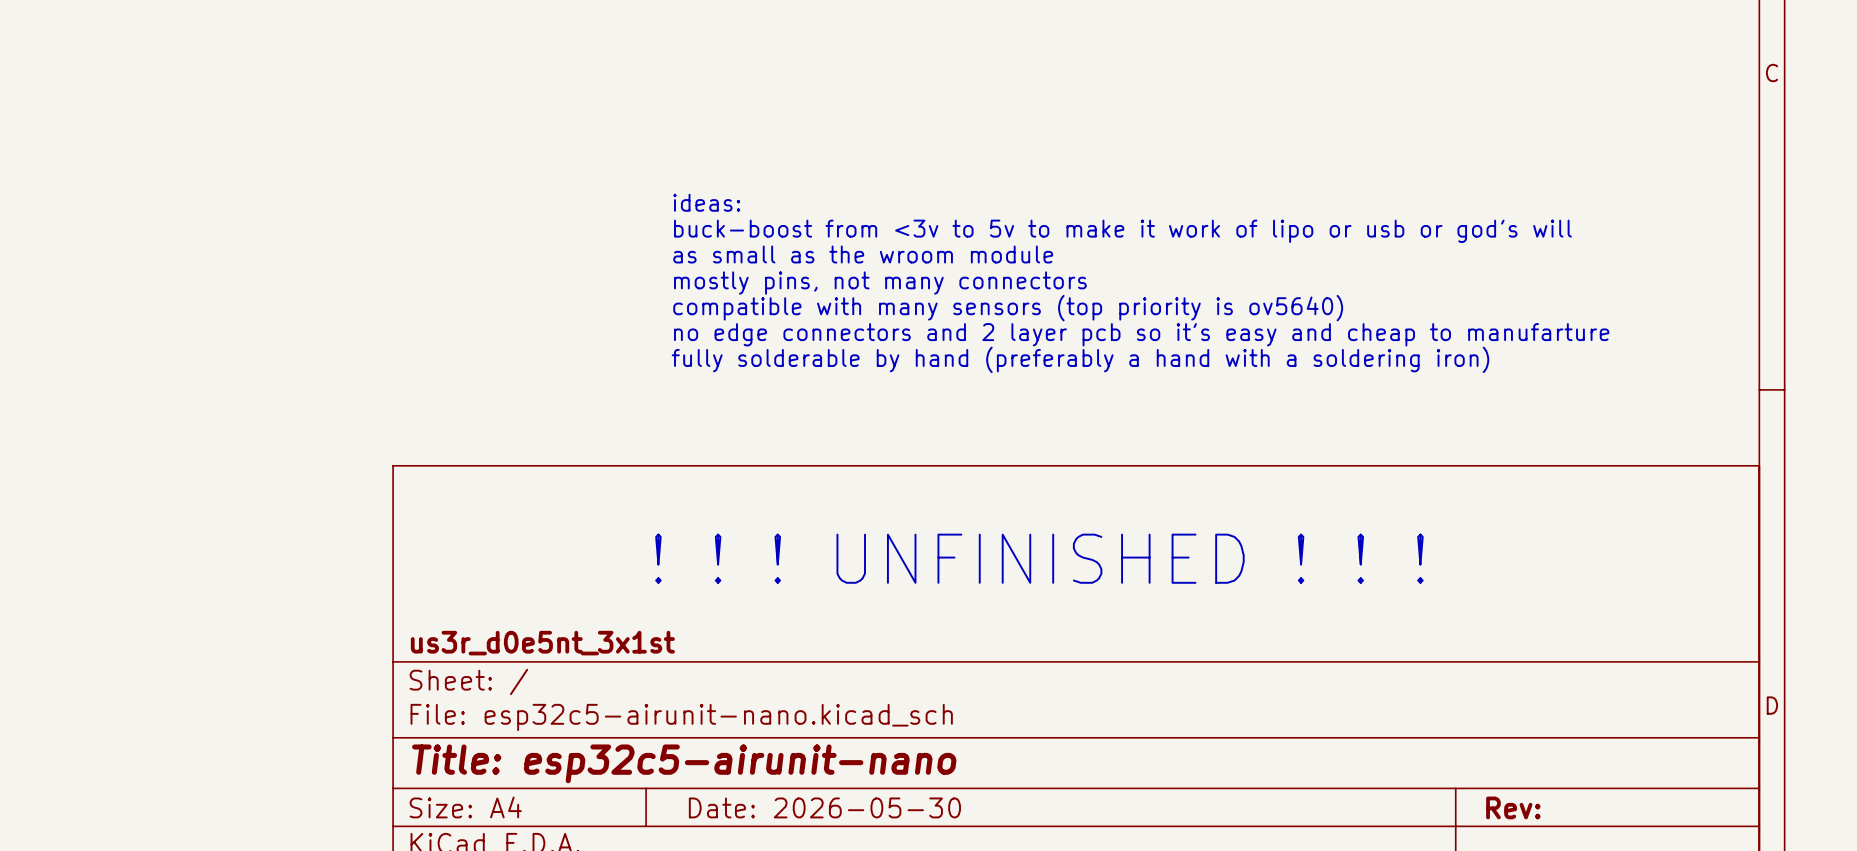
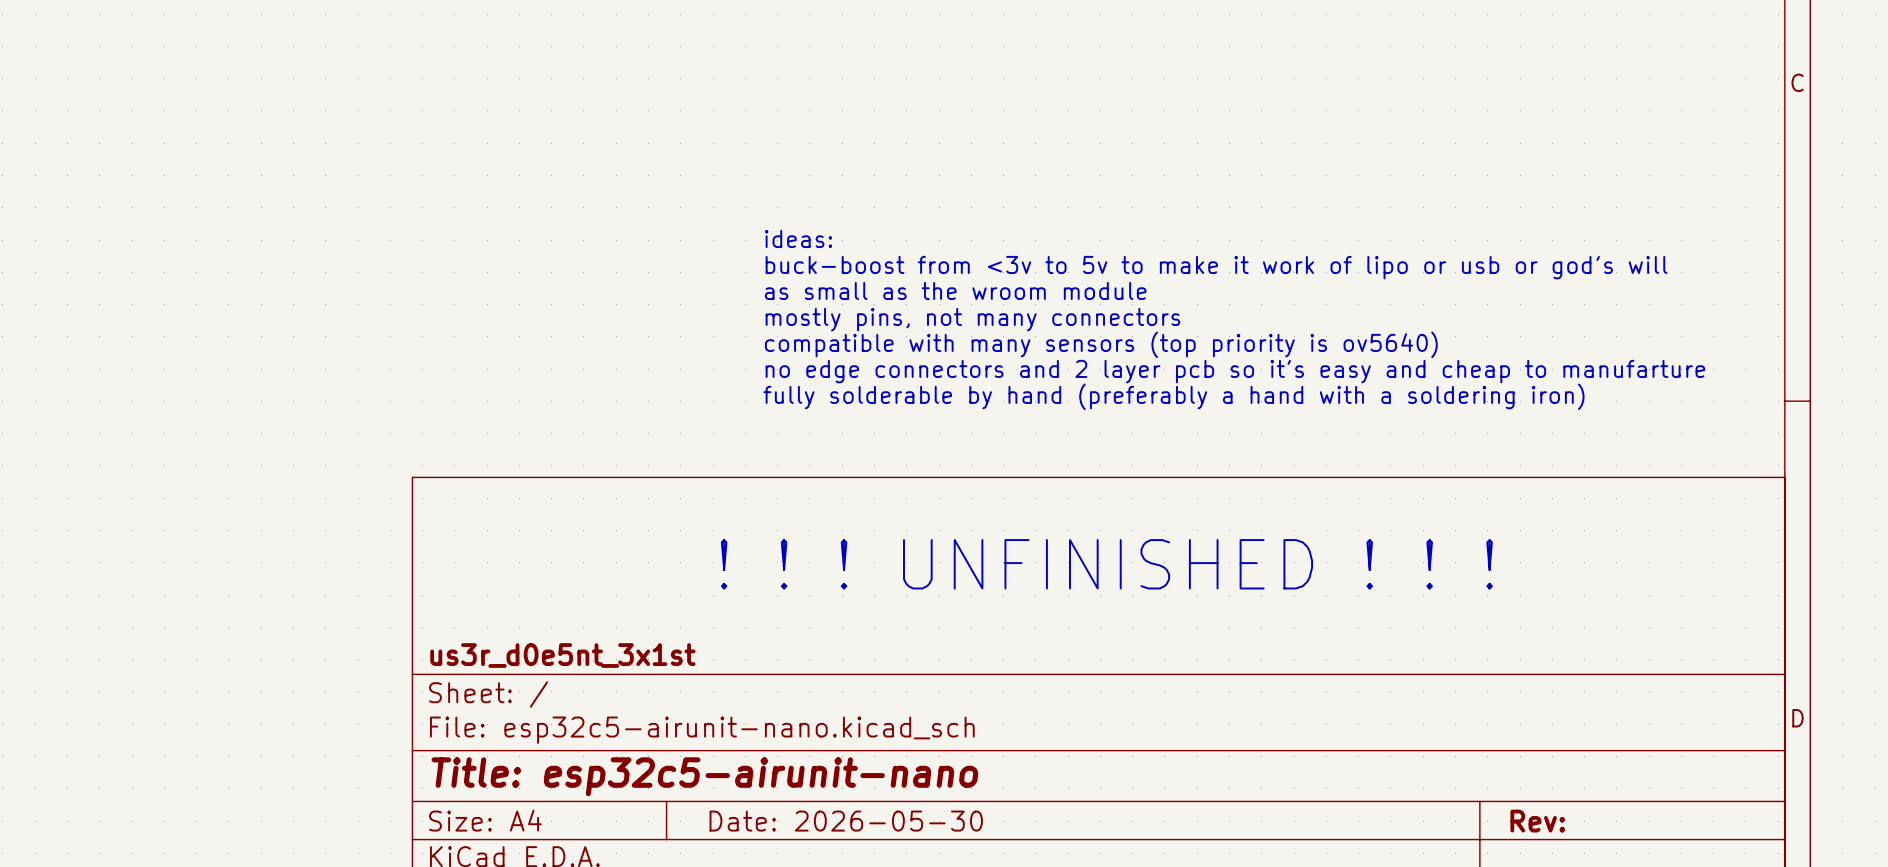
text position: ideas: (706, 202) -> ideas: (798, 238)
text position: buck-boost from <3v to 5v to make it work of lipo or usb or god's will (1122, 231) -> buck-boost from <3v to 5v to make it work of lipo or usb or god's will (1216, 267)
text position: as small as the wroom module (863, 254) -> as small as the wroom module (955, 290)
text position: mostly pins, not many connectors (880, 283) -> mostly pins, not many connectors (972, 319)
text position: compatible with many sensors (top priority is ov5640) (1008, 308) -> compatible with many sensors (top priority is ov5640) (1101, 344)
text position: no edge connectors and 2 layer pcb so it's easy and cheap to manufarture (1141, 334) -> no edge connectors and 2 layer pcb so it's easy and cheap to manufarture (1235, 371)
text position: fully solderable by hand (preferably a hand with a soldering iron) (1080, 359) -> fully solderable by hand (preferably a hand with a soldering iron) (1173, 396)
text position: ! ! ! UNFINISHED ! ! ! (1039, 558) -> ! ! ! UNFINISHED ! ! ! (1106, 564)

